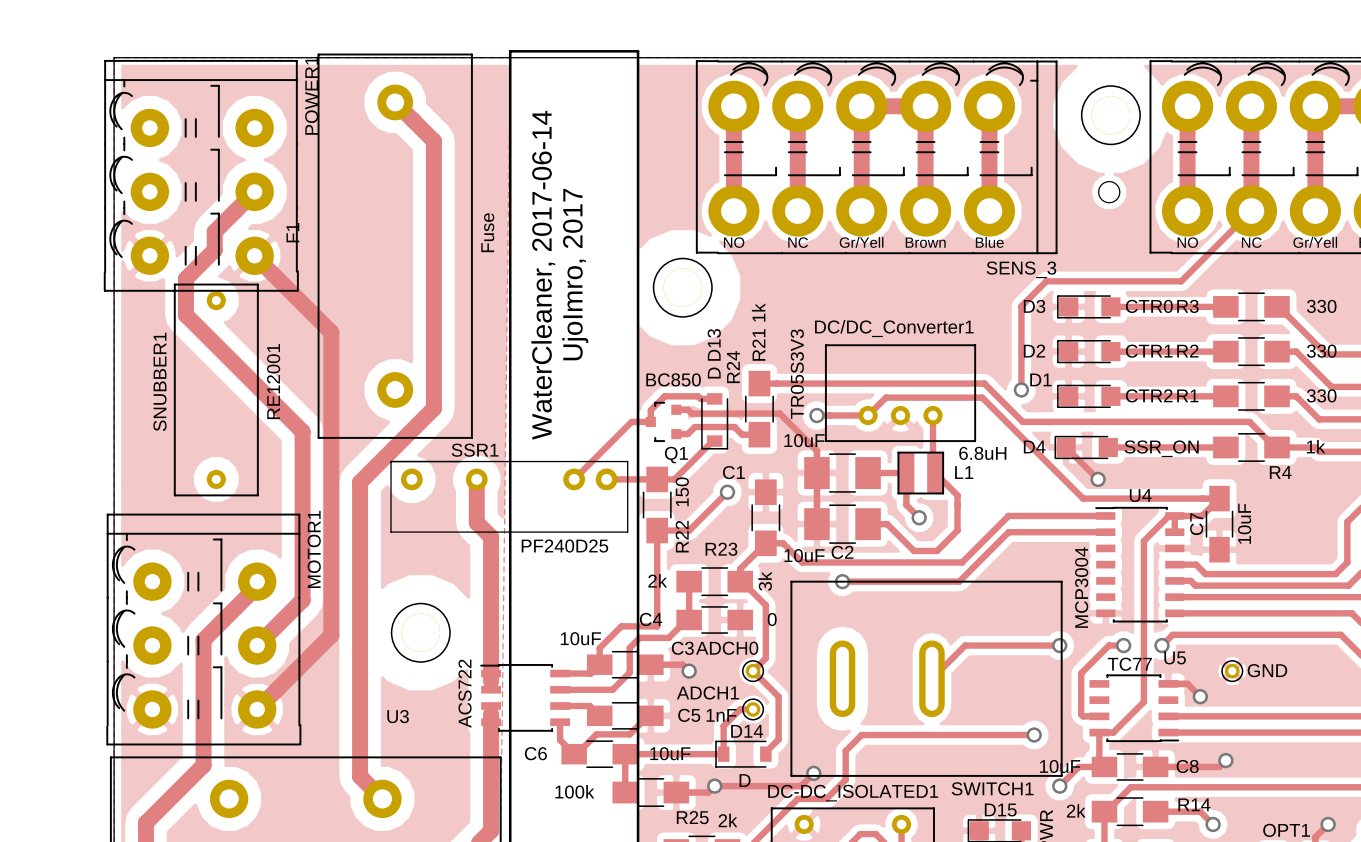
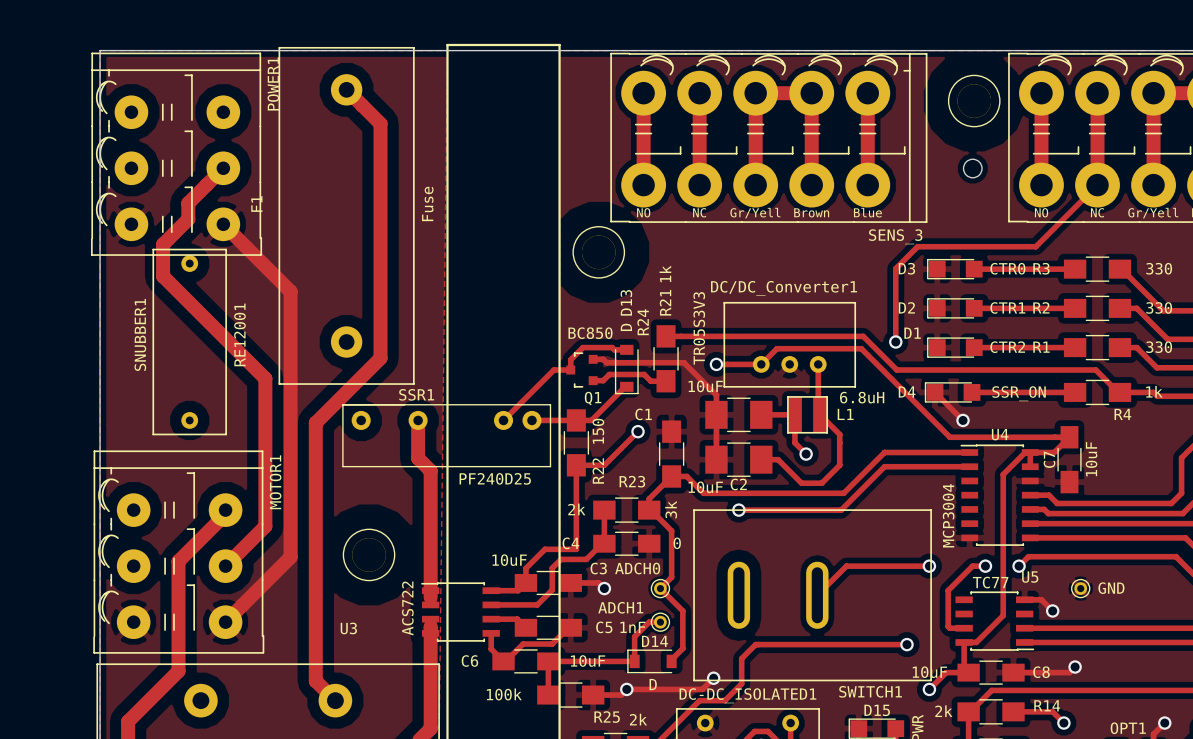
text: UjoImro, 2017 (575, 274) -> none
text: WaterCleaner, 2017-06-14 (543, 275) -> none

